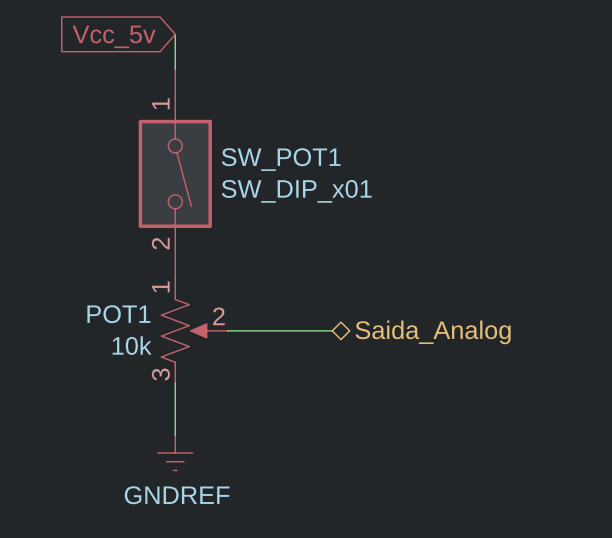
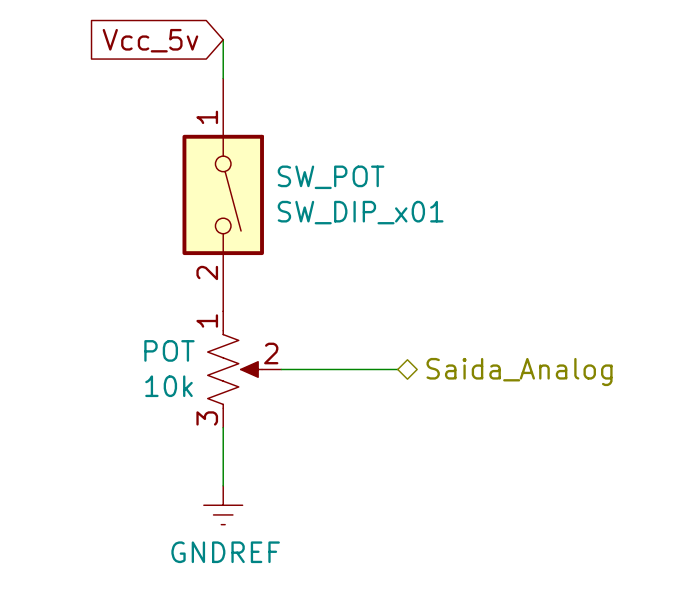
SW_POT1 name: SW_POT1 (281, 159) -> SW_POT (331, 177)
POT1 name: POT1 (118, 314) -> POT (169, 350)

